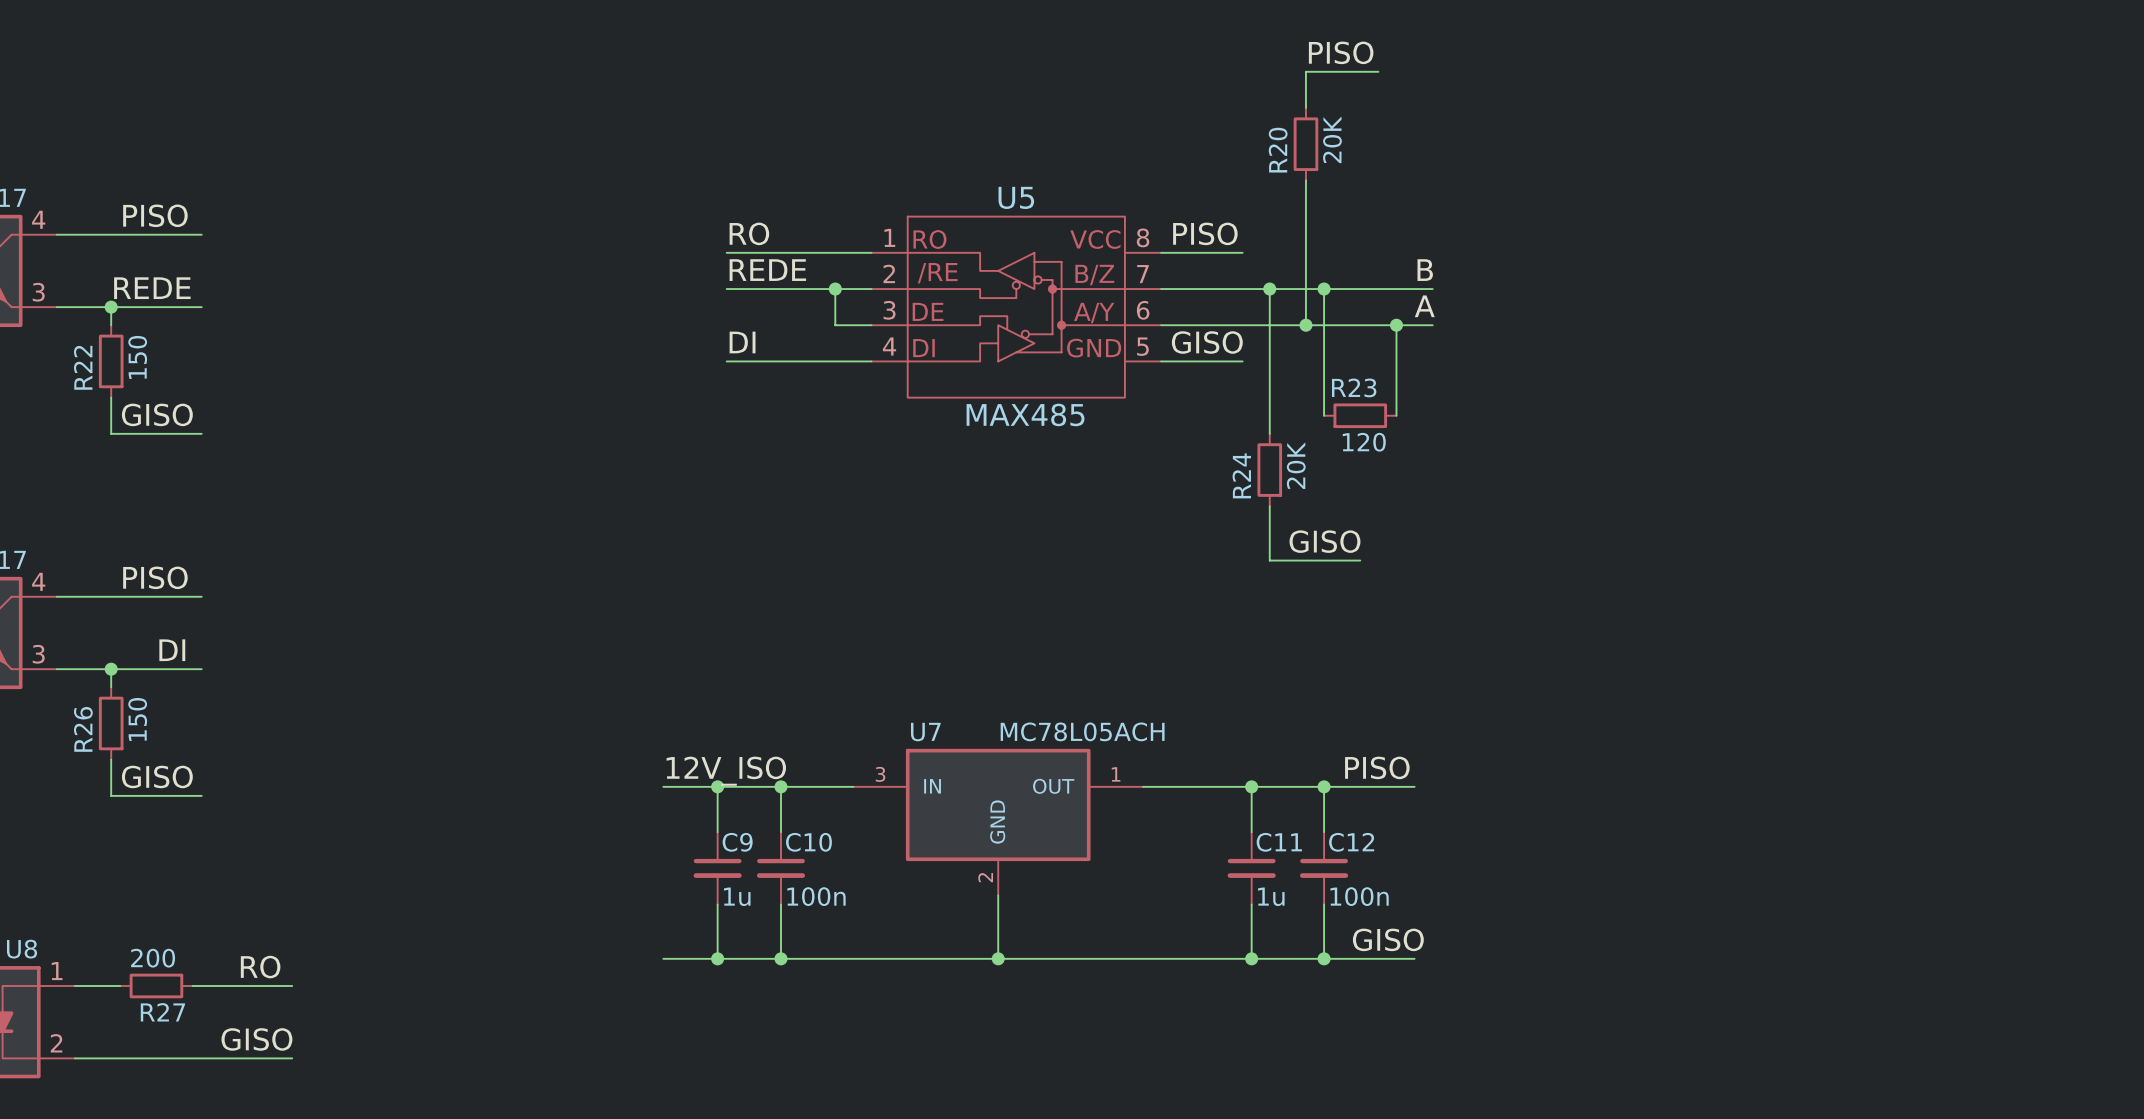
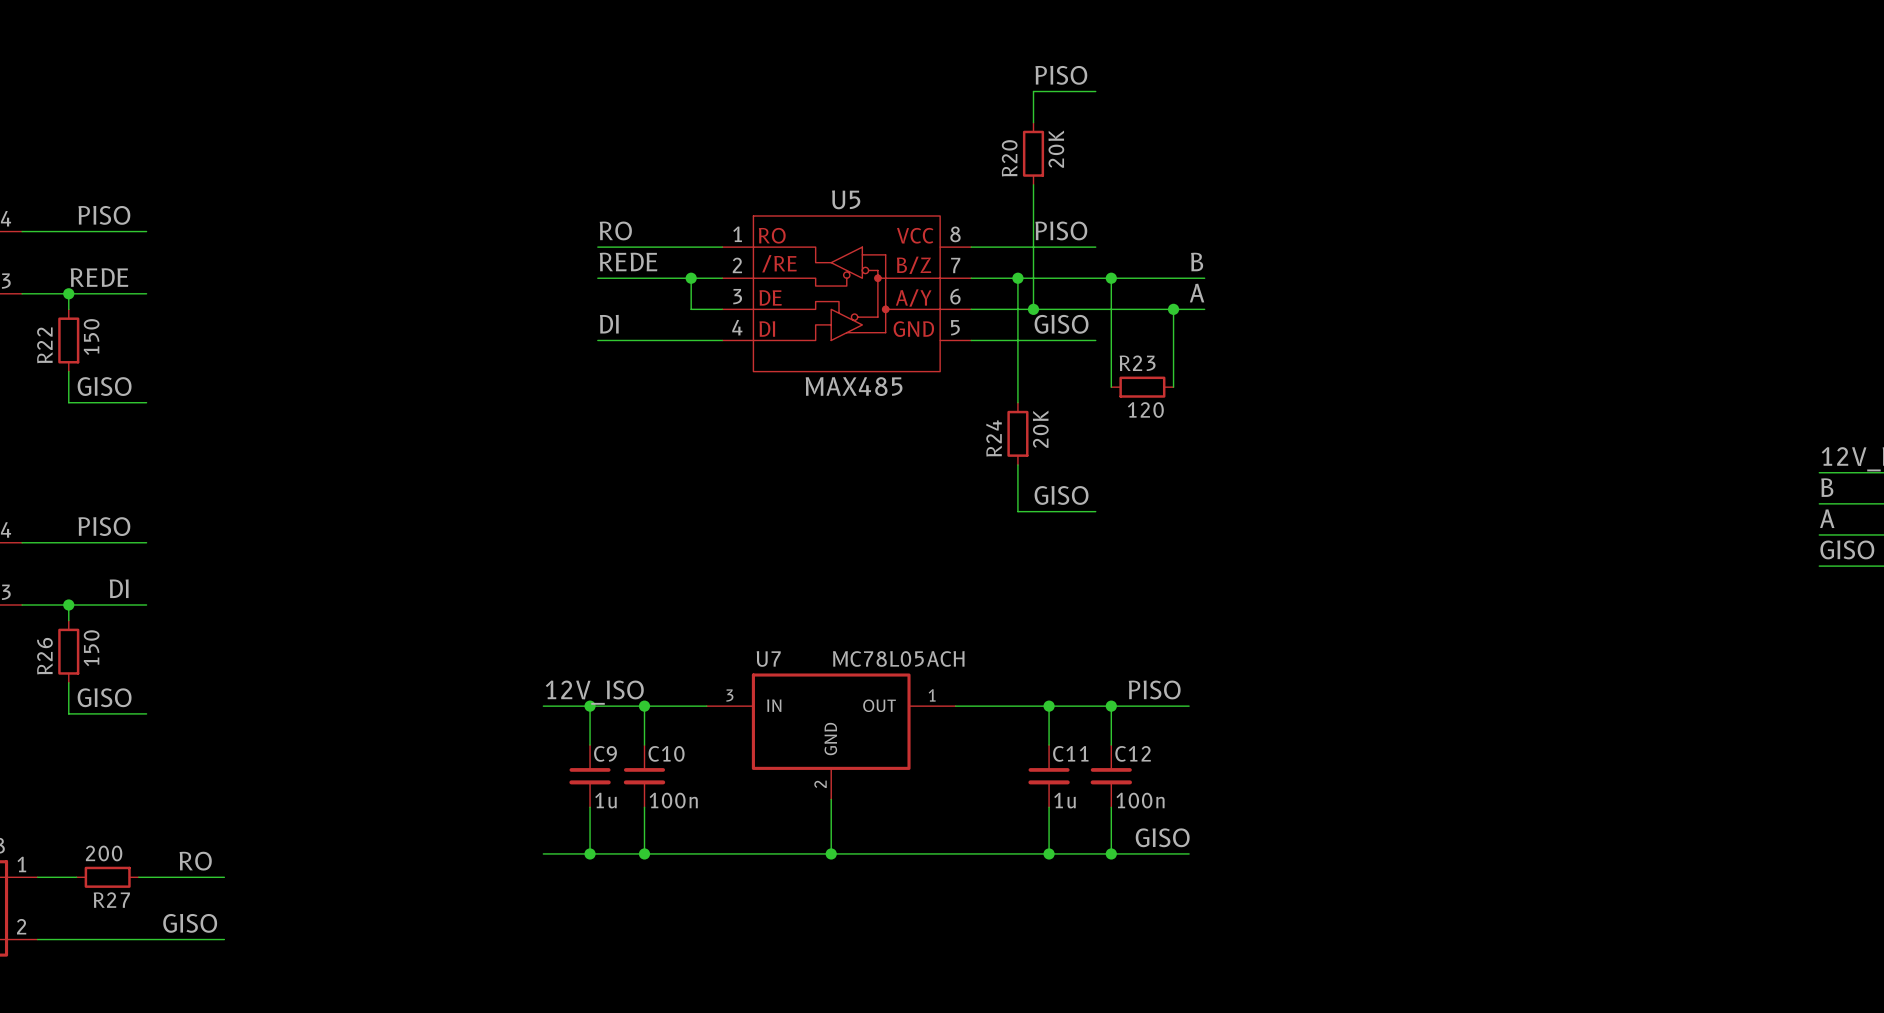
label position: PISO (1341, 52) -> PISO (1061, 75)
wire: (1378, 71) (1305, 71) (1305, 108) -> (1095, 91) (1033, 91) (1033, 122)
R20 position: (1305, 144) -> (1033, 153)
wire: (1305, 180) (1305, 325) -> (1033, 184) (1033, 309)
label position: PISO (1205, 233) -> PISO (1061, 230)
wire: none -> (1041, 247) (1095, 247)
junction: none -> (1017, 278)
wire: (1269, 289) (1269, 433) -> (1017, 278) (1017, 402)
junction: (1269, 289) -> none
junction: none -> (1033, 309)
junction: (1305, 325) -> none
label position: GISO (1207, 342) -> GISO (1061, 324)
wire: none -> (1041, 340) (1095, 340)
R24 position: (1269, 470) -> (1017, 433)
wire: (1269, 506) (1269, 560) -> (1017, 464) (1017, 511) (1064, 511)
label position: GISO (1324, 541) -> GISO (1061, 495)
wire: (1305, 560) (1360, 560) -> none

